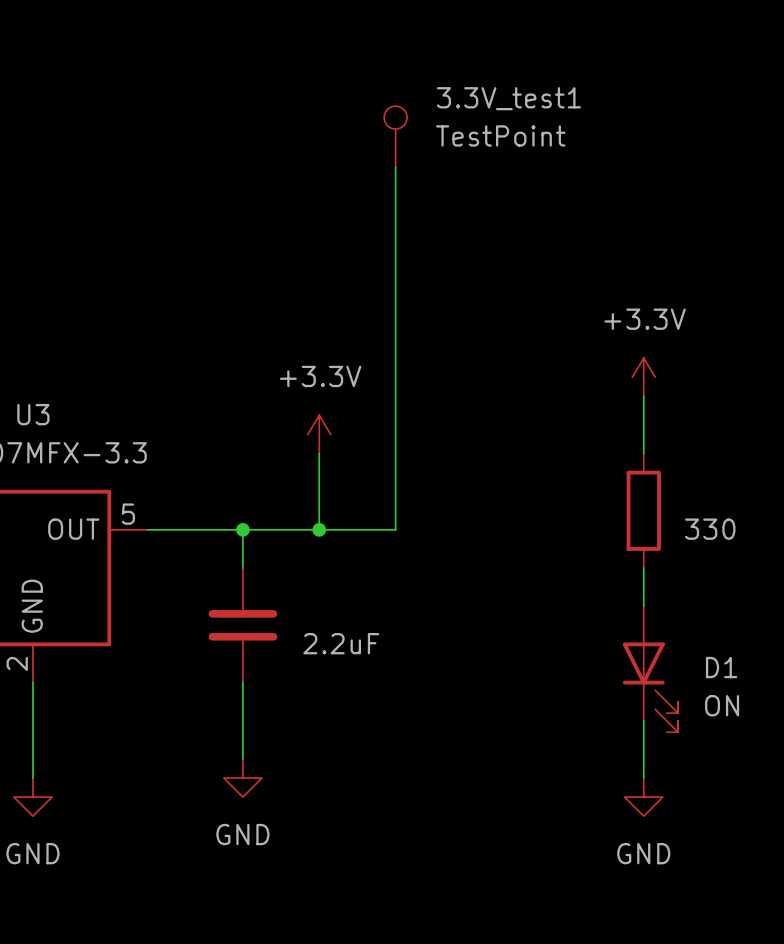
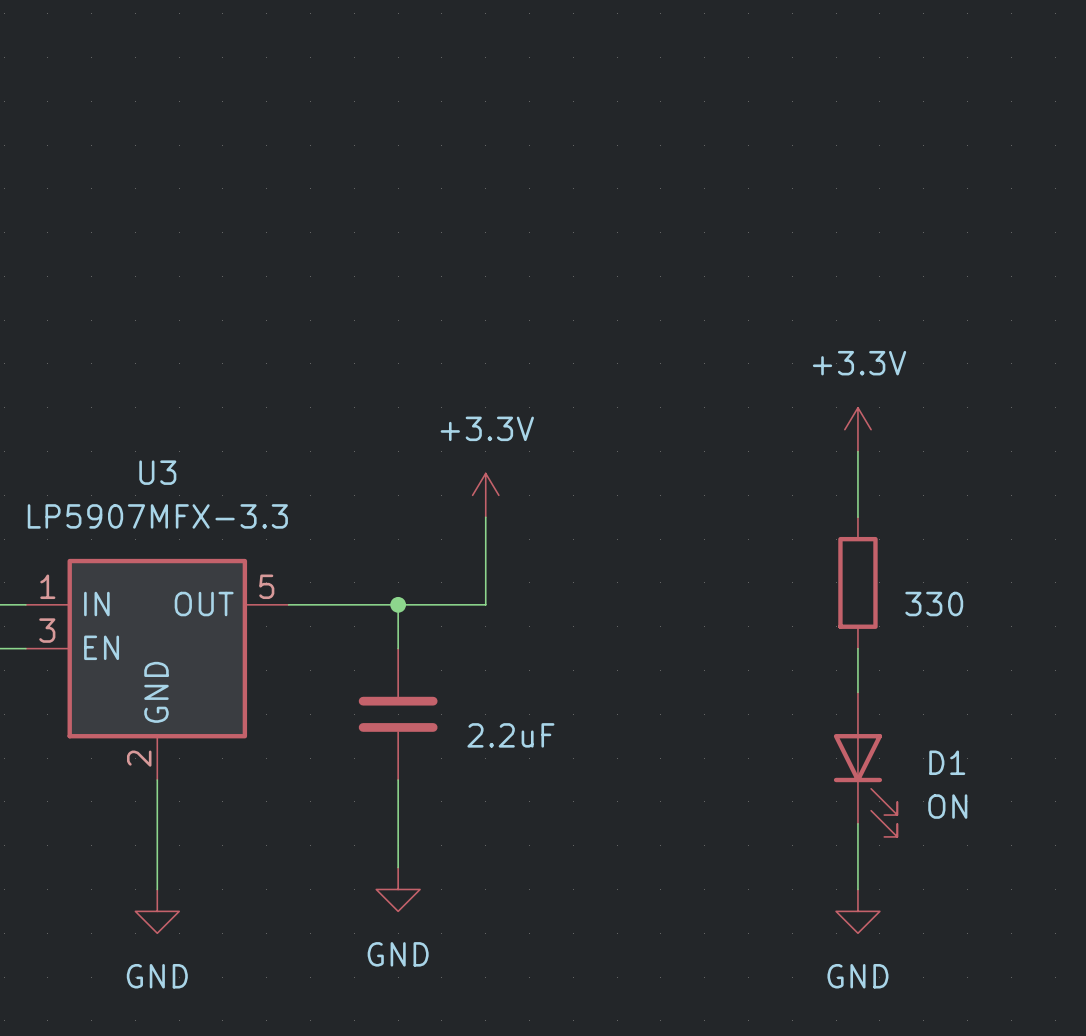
3.3V_test1: TestPoint (395, 136) -> none
wire: (395, 167) (395, 529) (319, 529) -> none
junction: (319, 529) -> none

